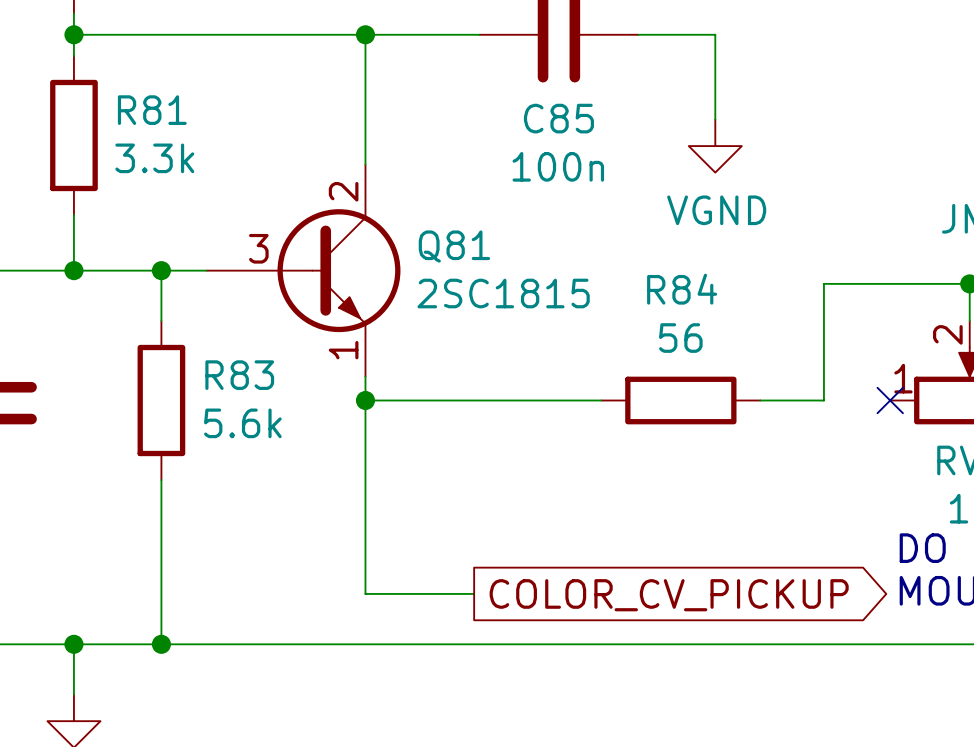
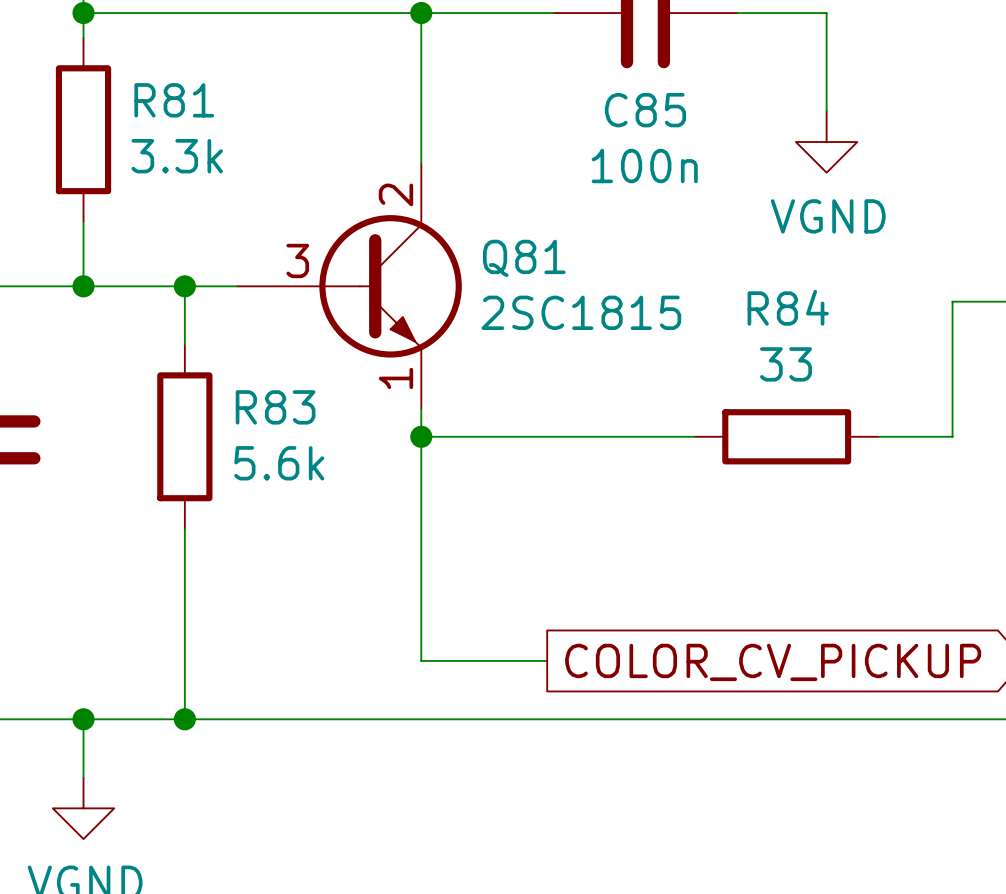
R84 value: 56 (680, 338) -> 33 (785, 364)

